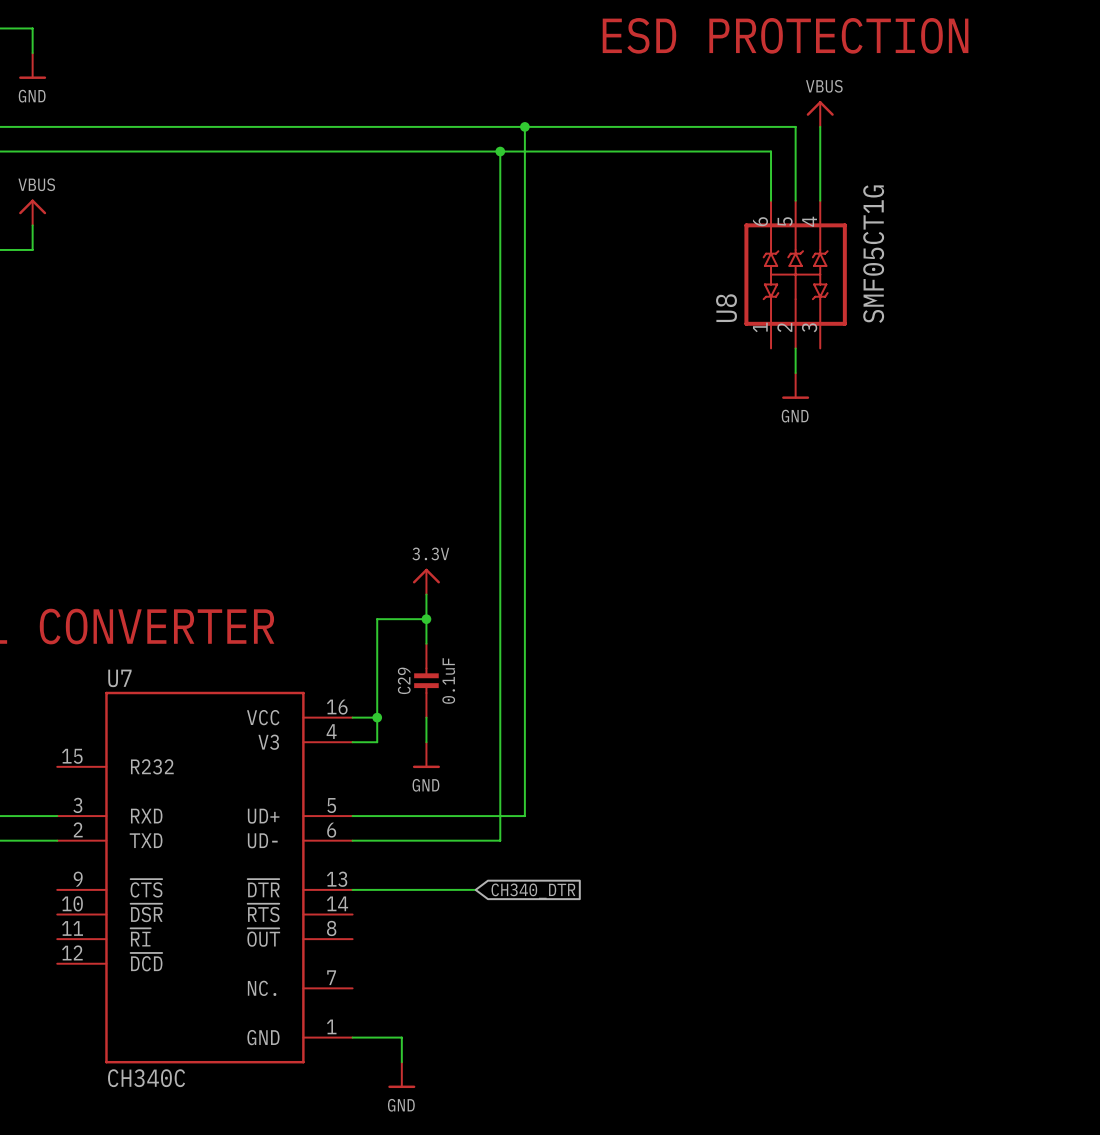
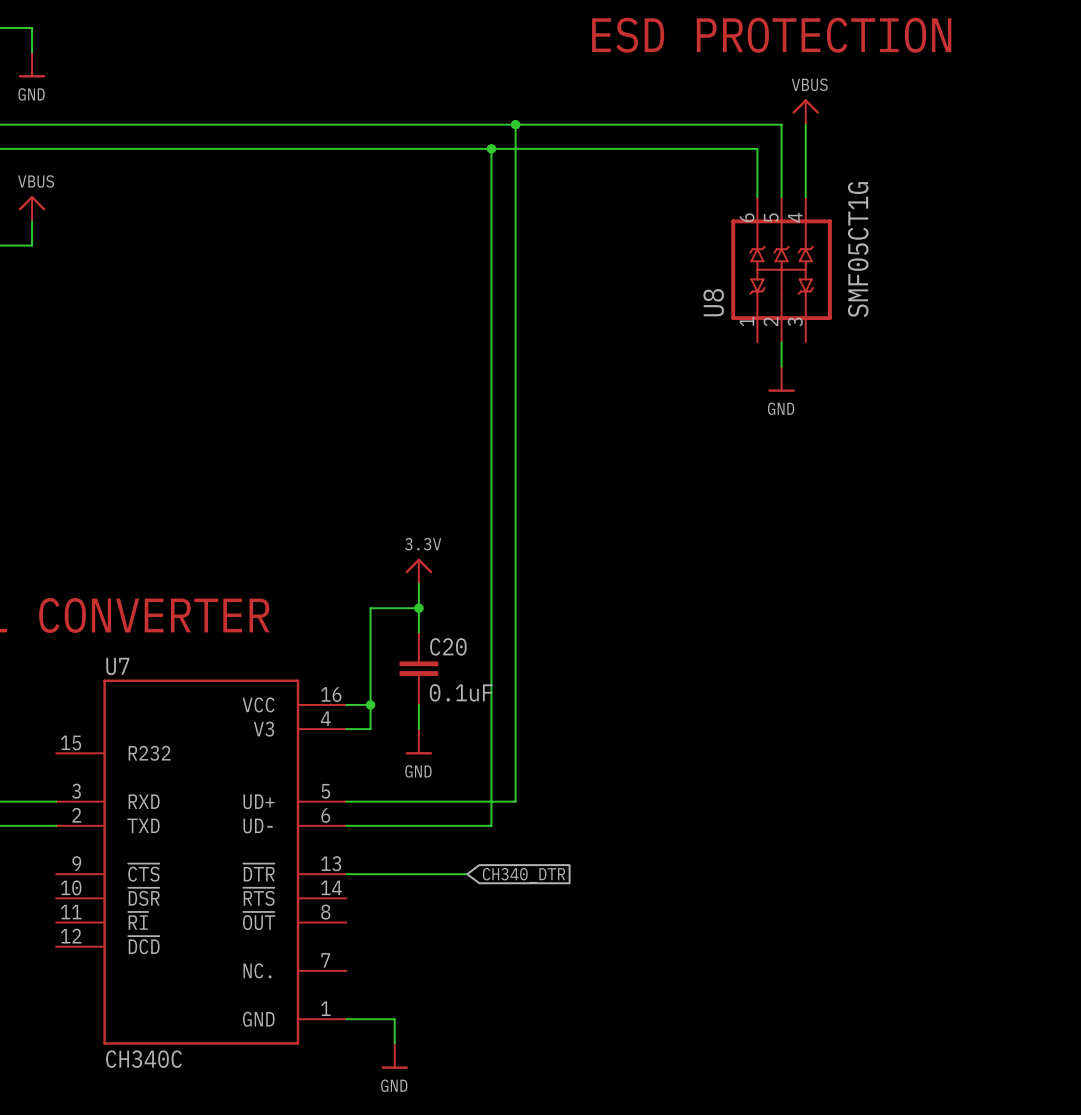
C29: 0.1uF (426, 680) -> none
C20: none -> 0.1uF (418, 668)

